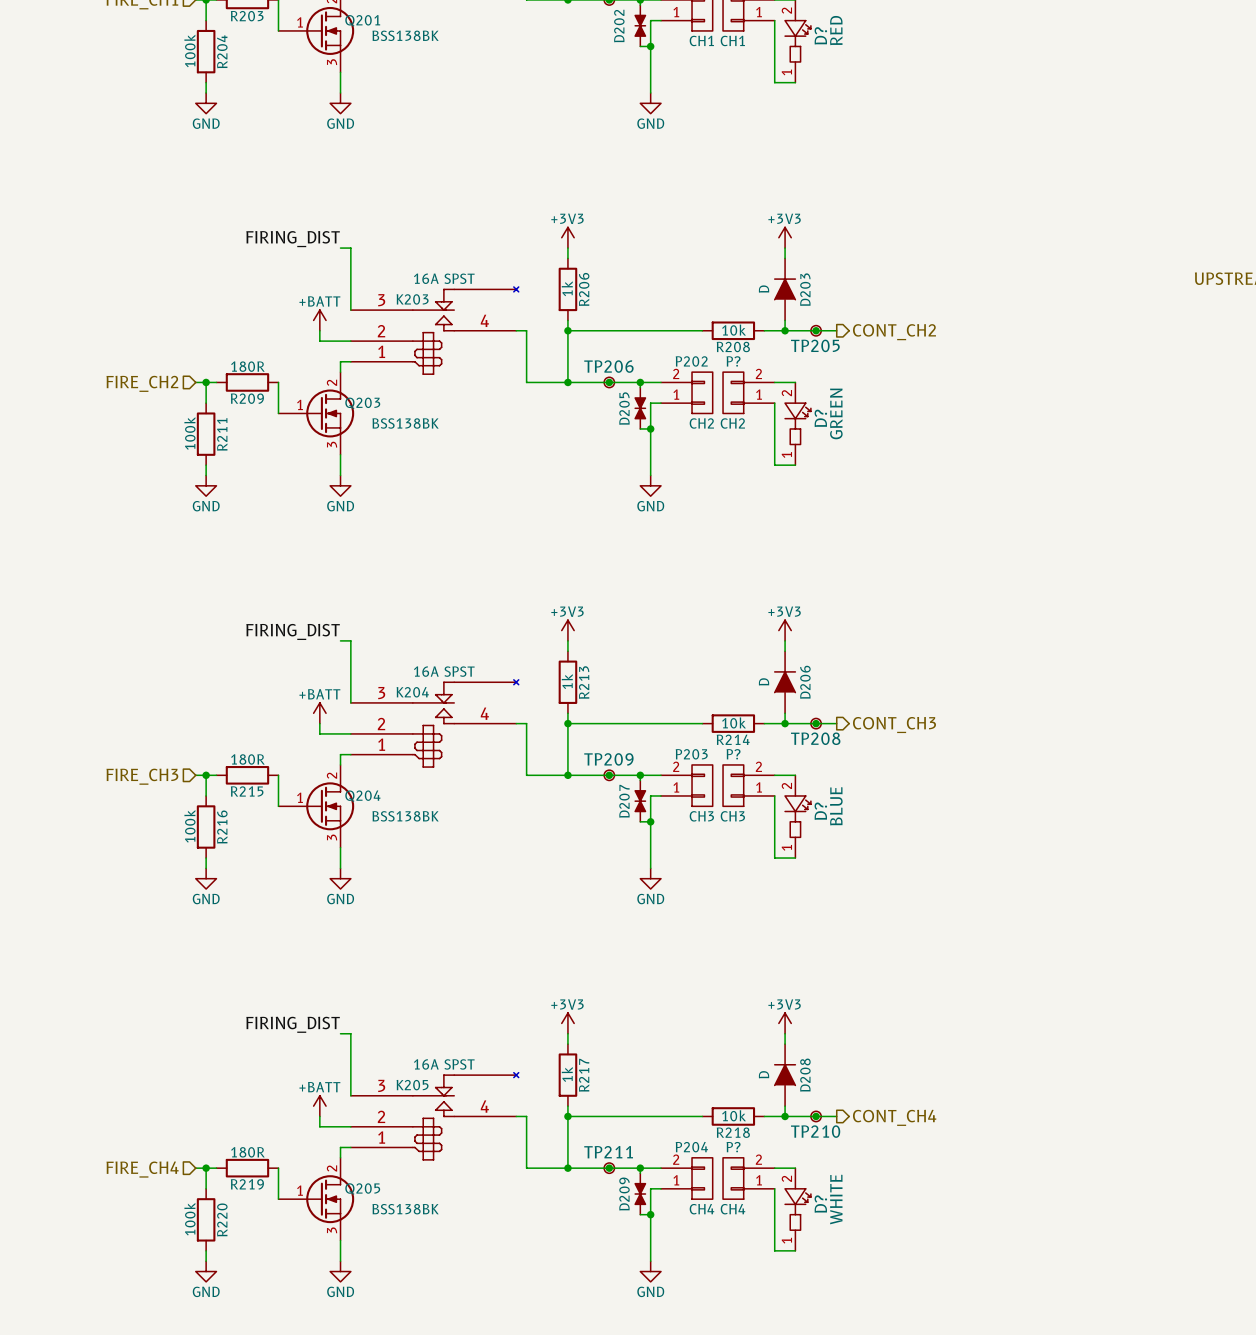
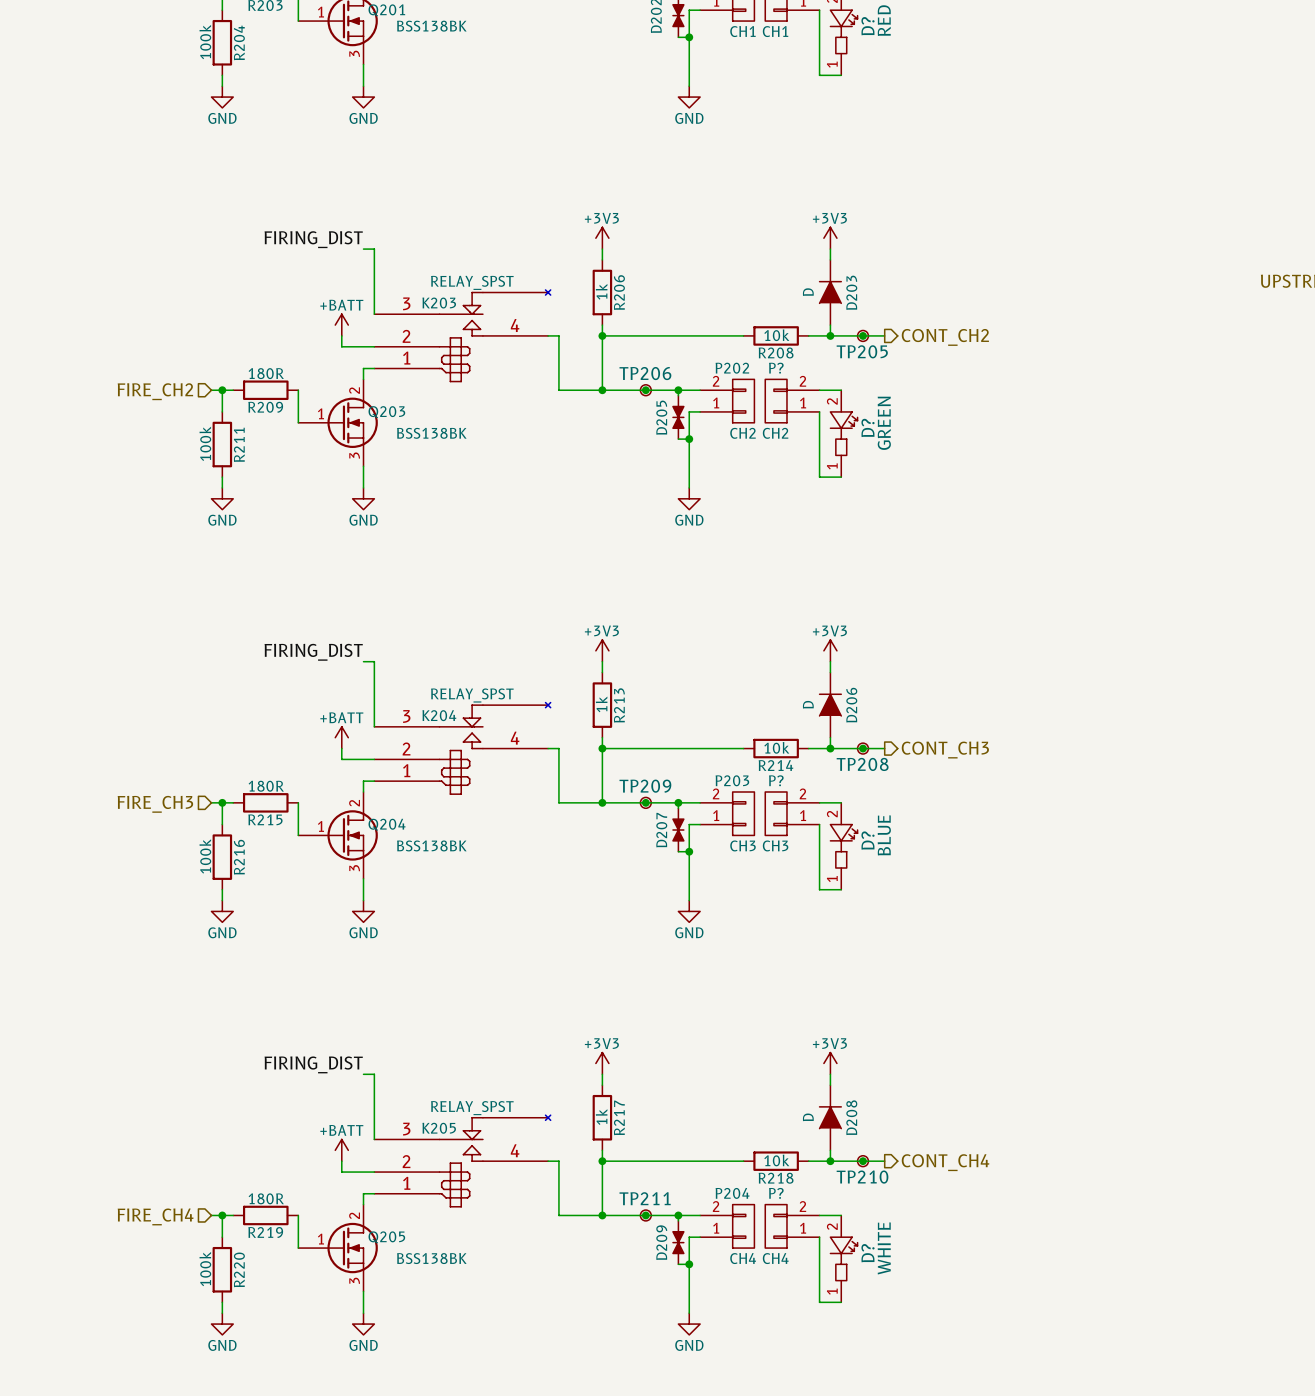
K203 value: 16A SPST (444, 278) -> RELAY_SPST (472, 282)
K204 value: 16A SPST (444, 671) -> RELAY_SPST (472, 695)
K205 value: 16A SPST (444, 1064) -> RELAY_SPST (472, 1108)

